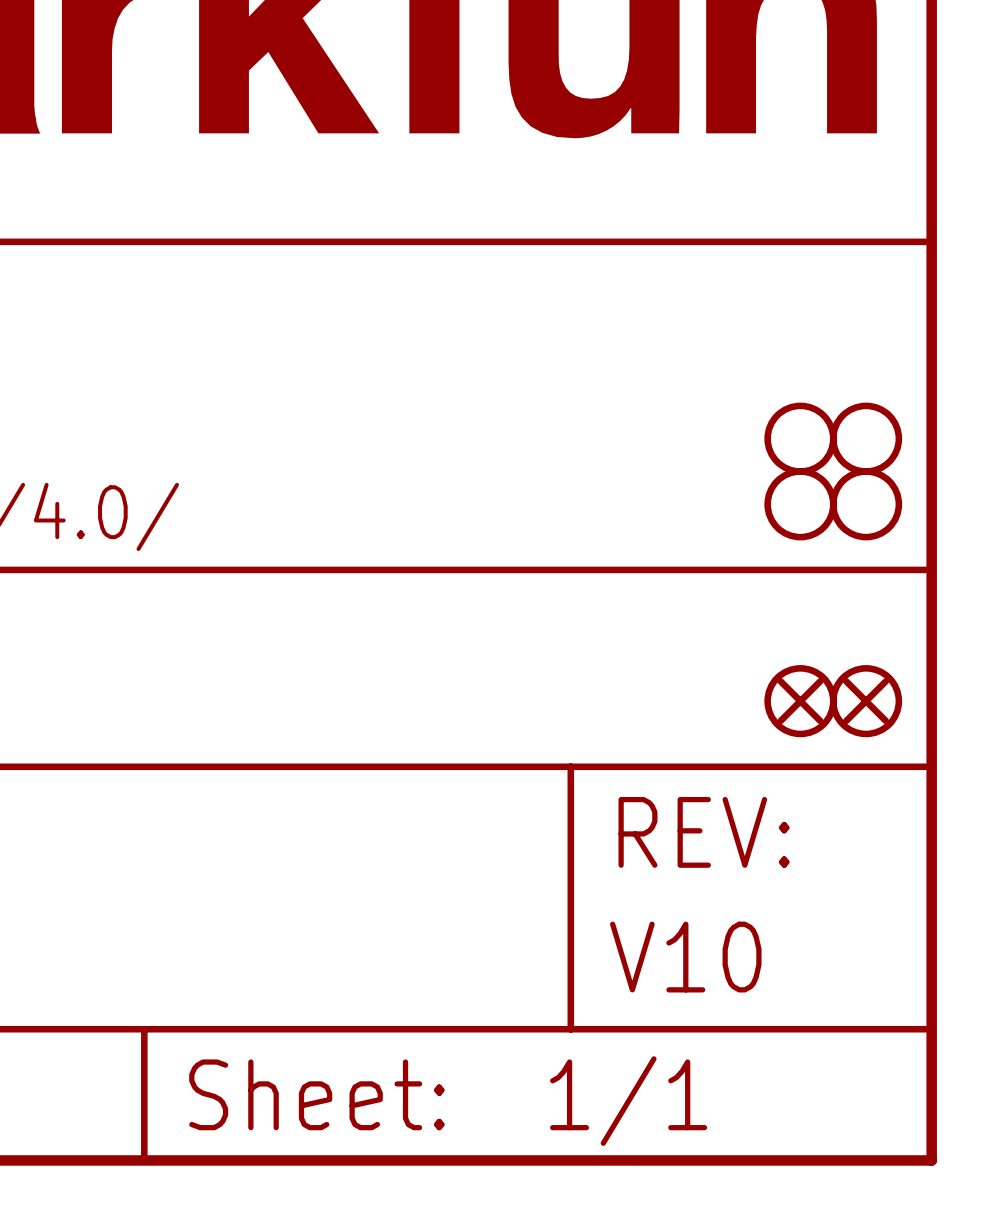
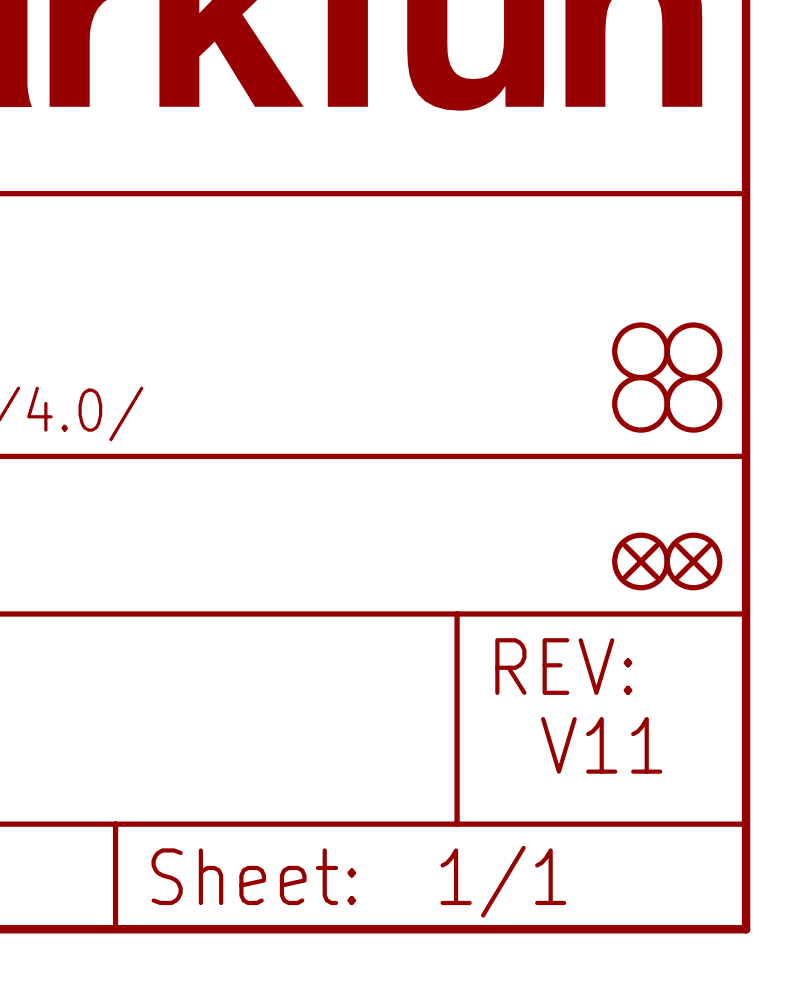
text: none -> V11 (601, 745)
part text: V10 (685, 957) -> none

